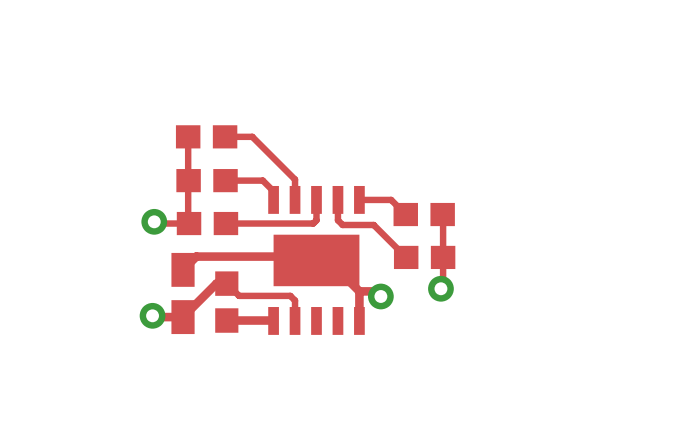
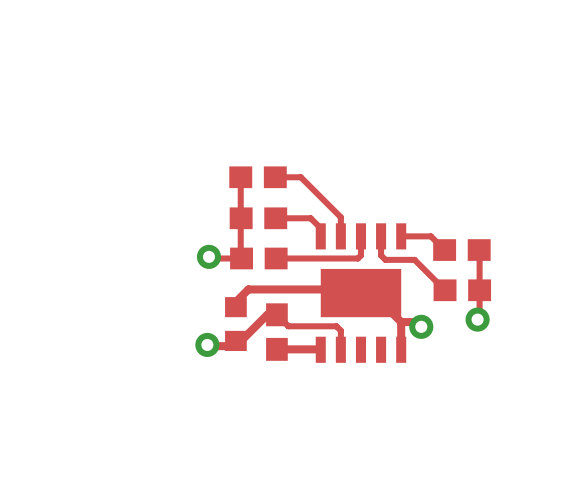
part footprint: [171, 252, 195, 335] -> [225, 297, 247, 351]

